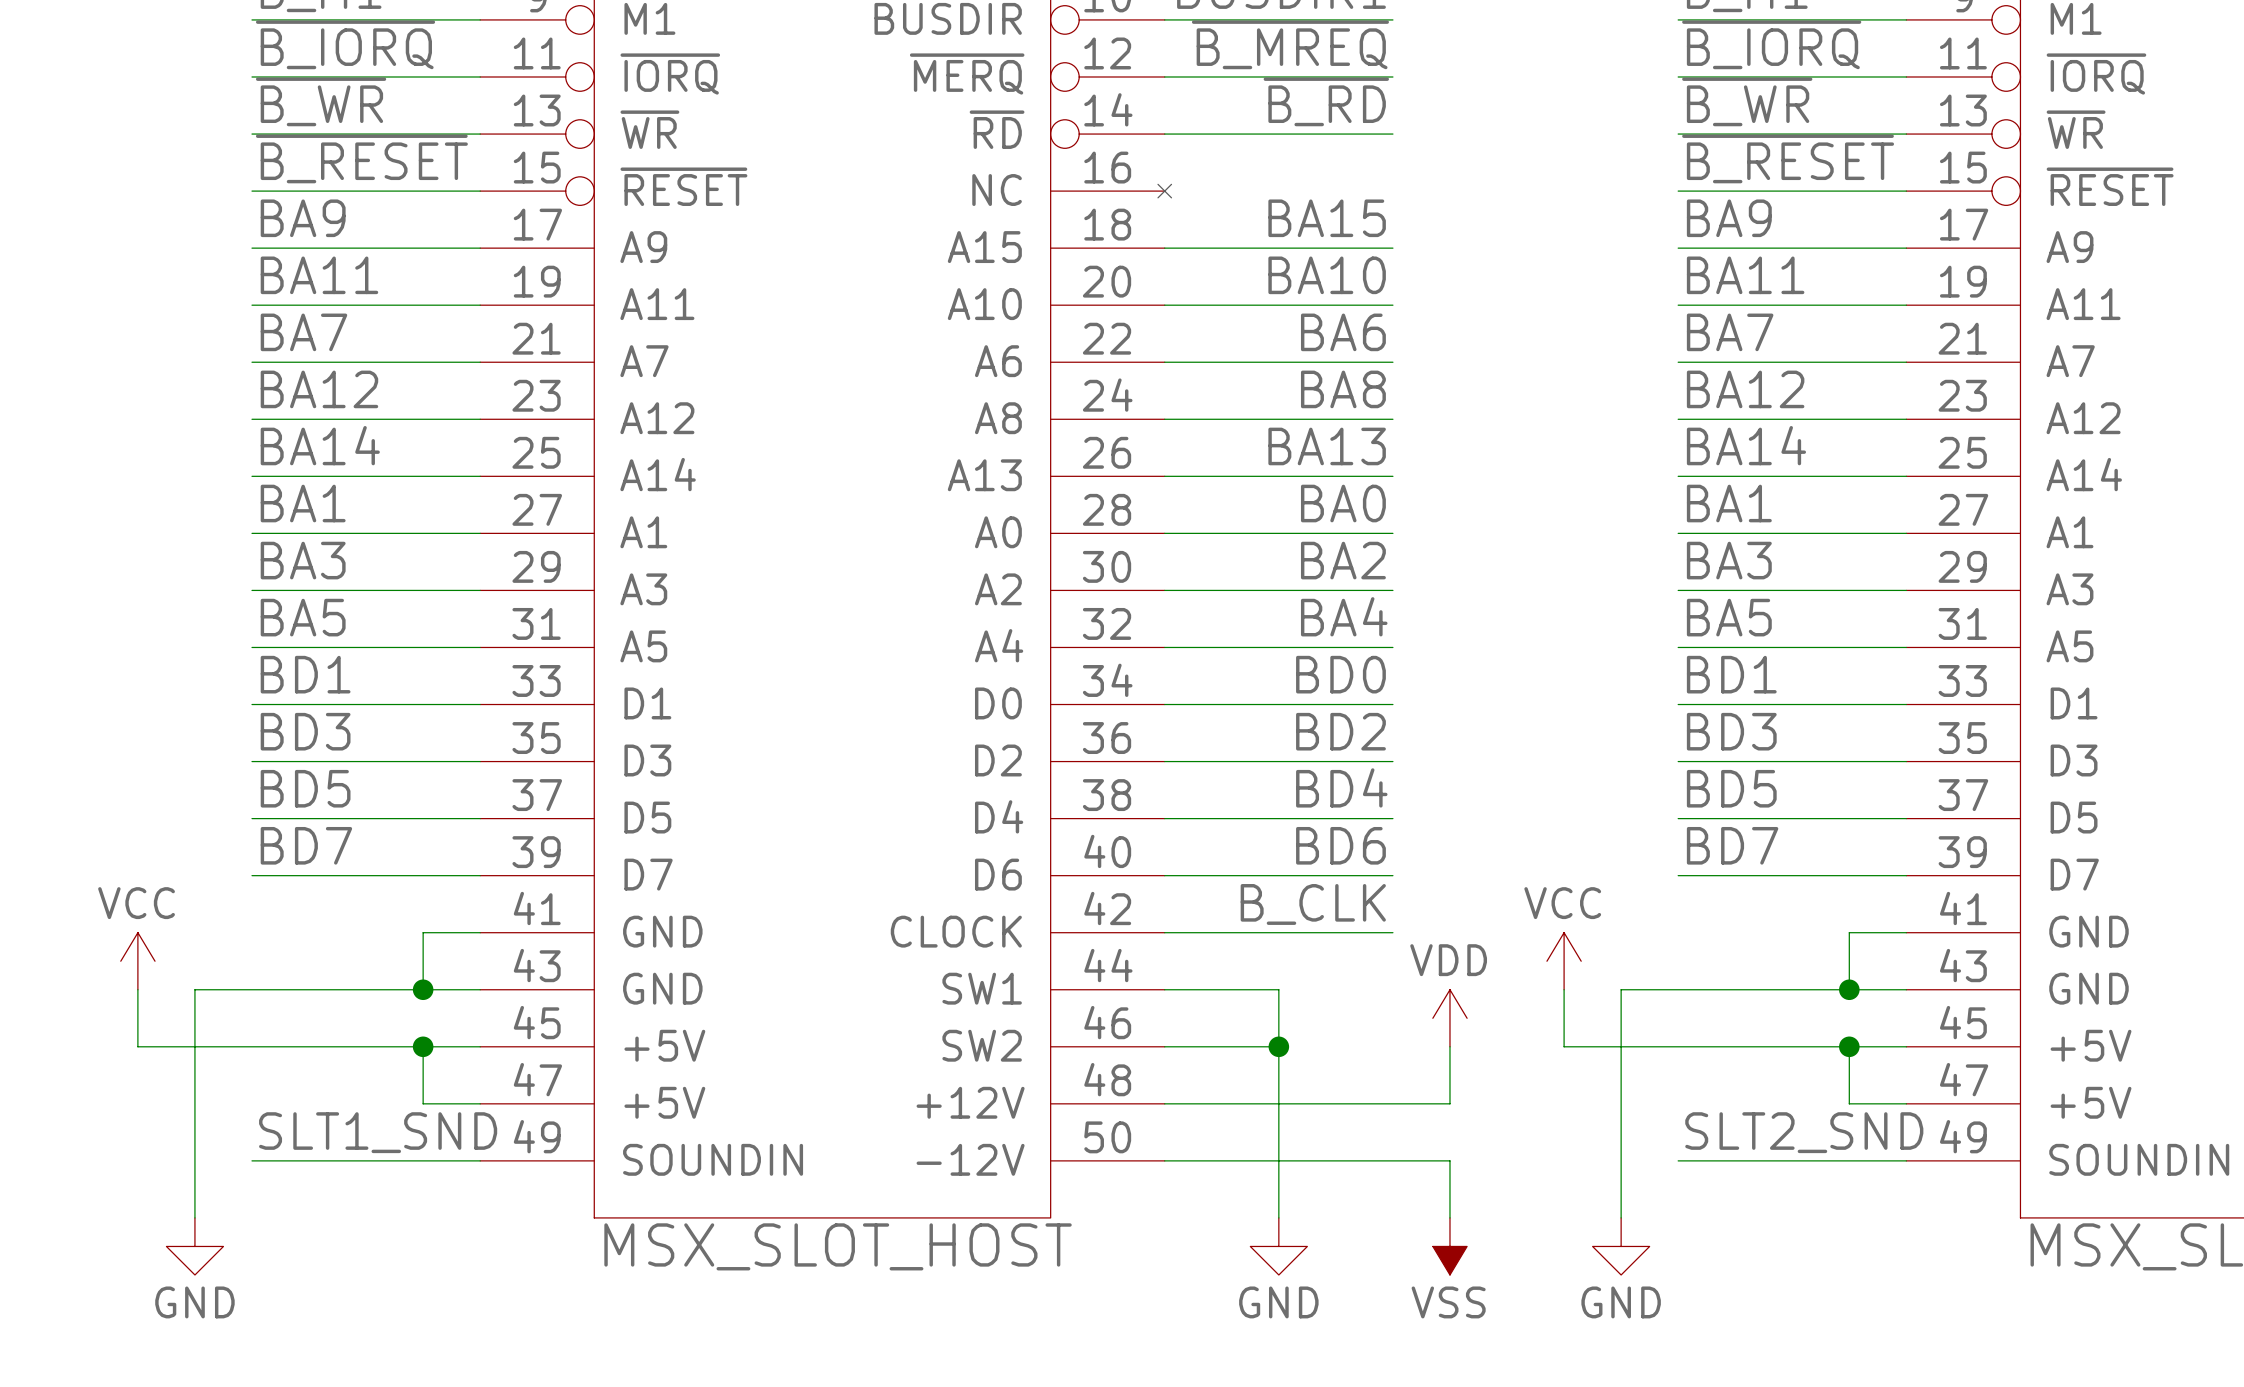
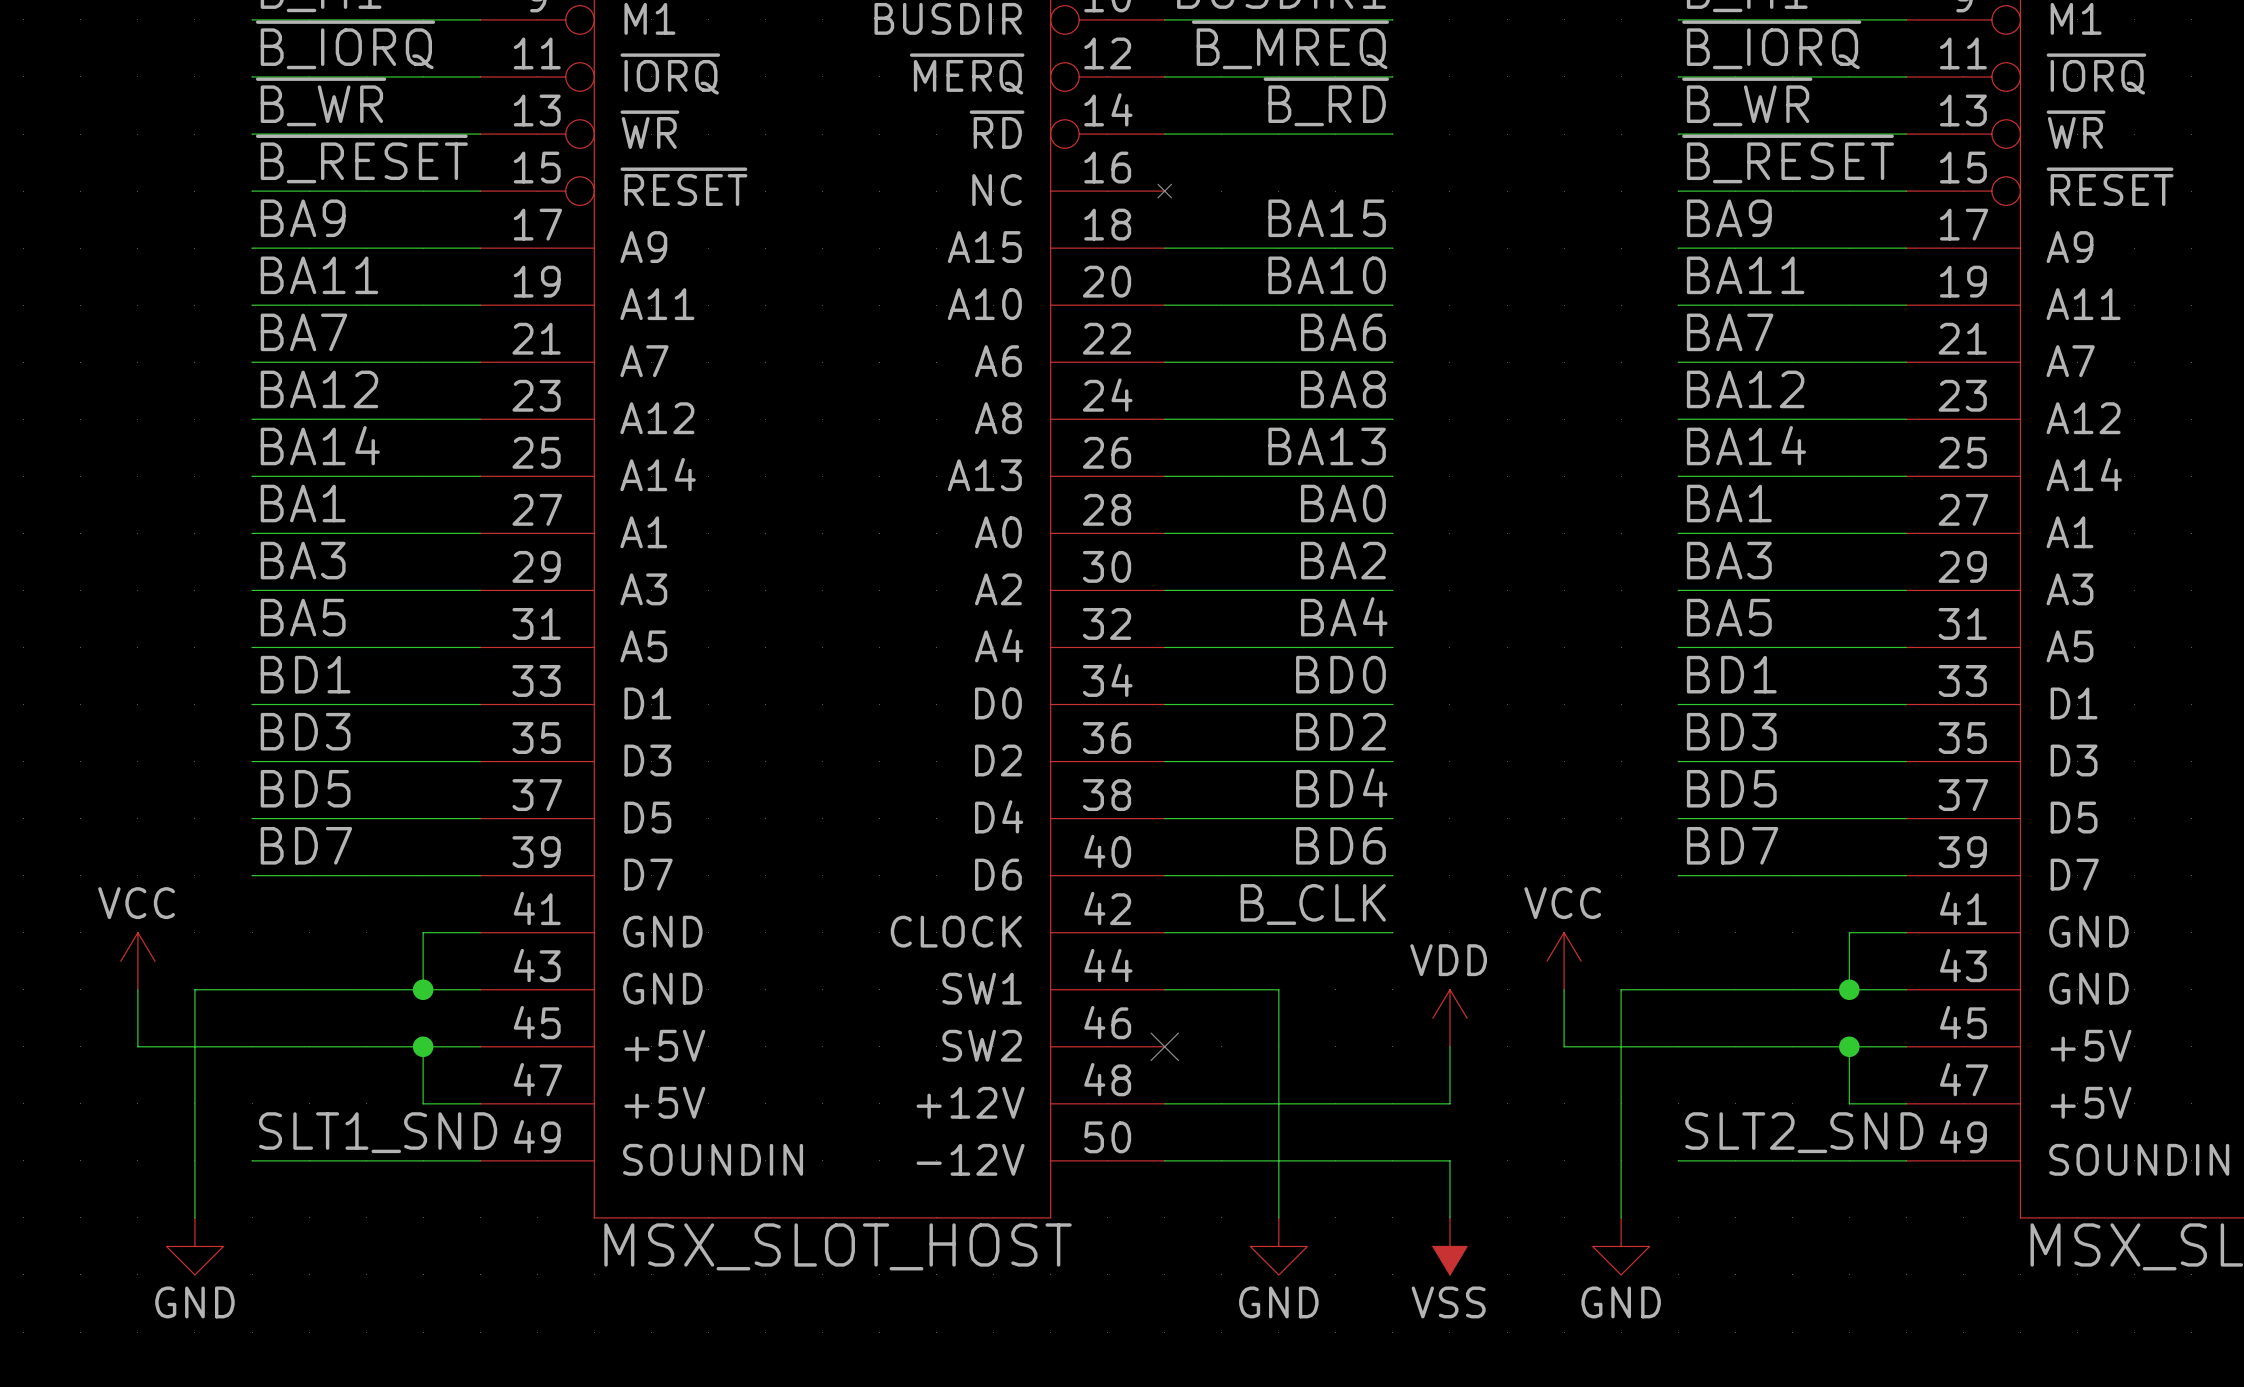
wire: (1164, 1046) (1278, 1046) -> none
no-connect mark: none -> (1164, 1046)
junction: (1278, 1046) -> none

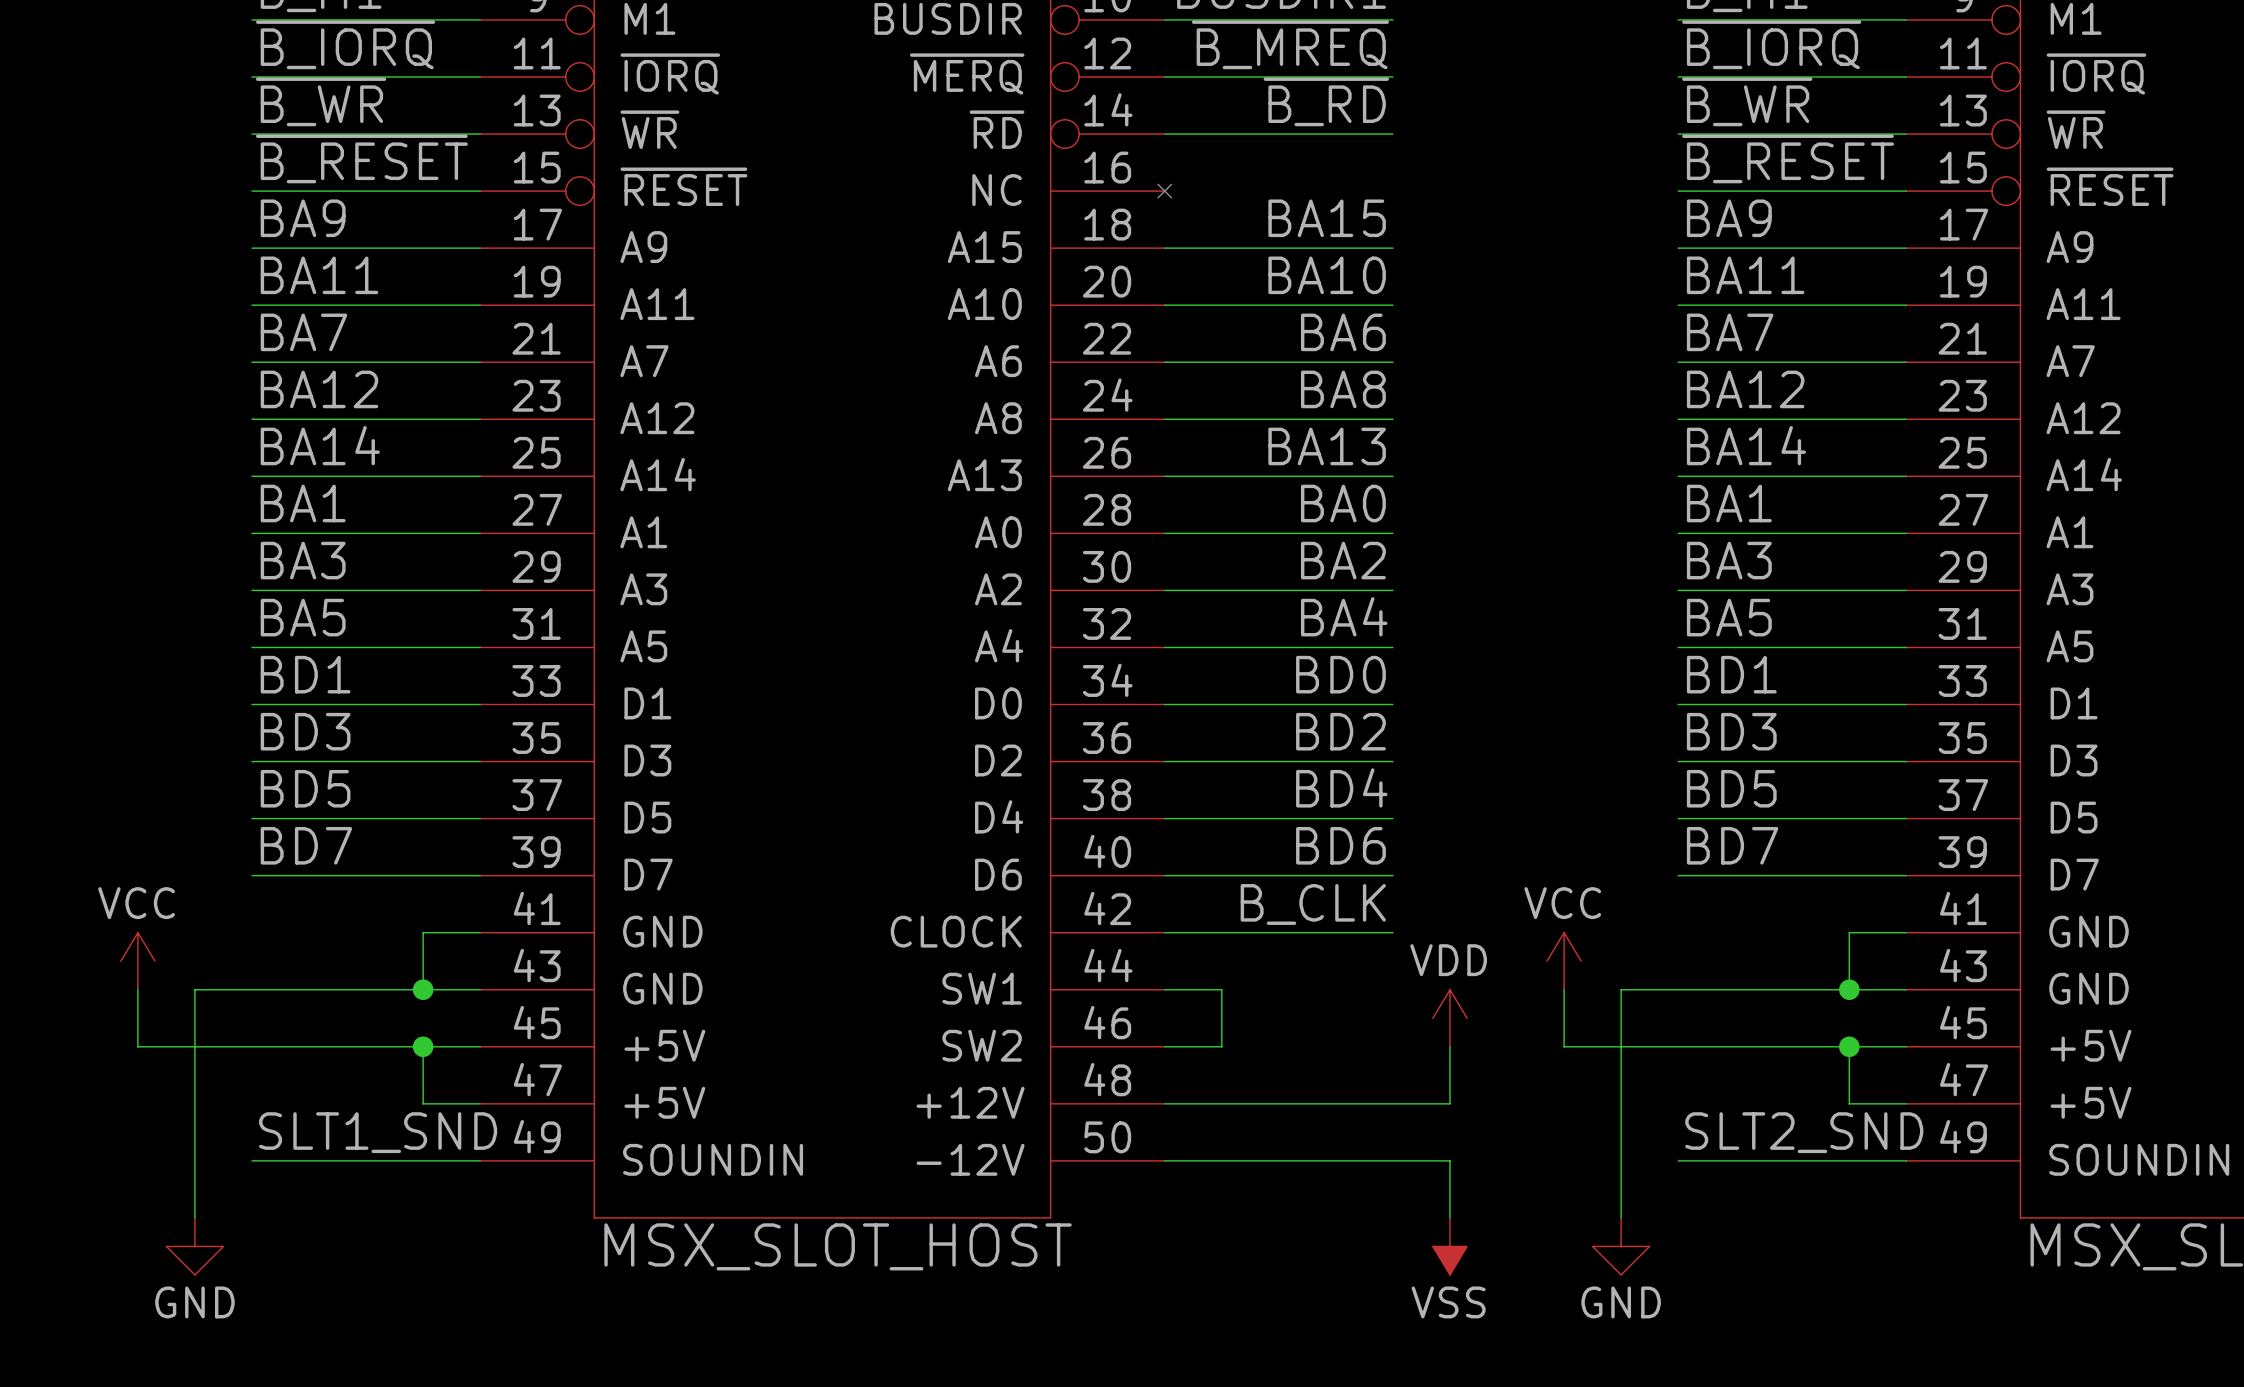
wire: (1221, 989) (1278, 989) (1278, 1217) -> (1221, 989) (1221, 1046) (1164, 1046)
no-connect mark: (1164, 1046) -> none
power symbol: GND (1278, 1246) -> none

